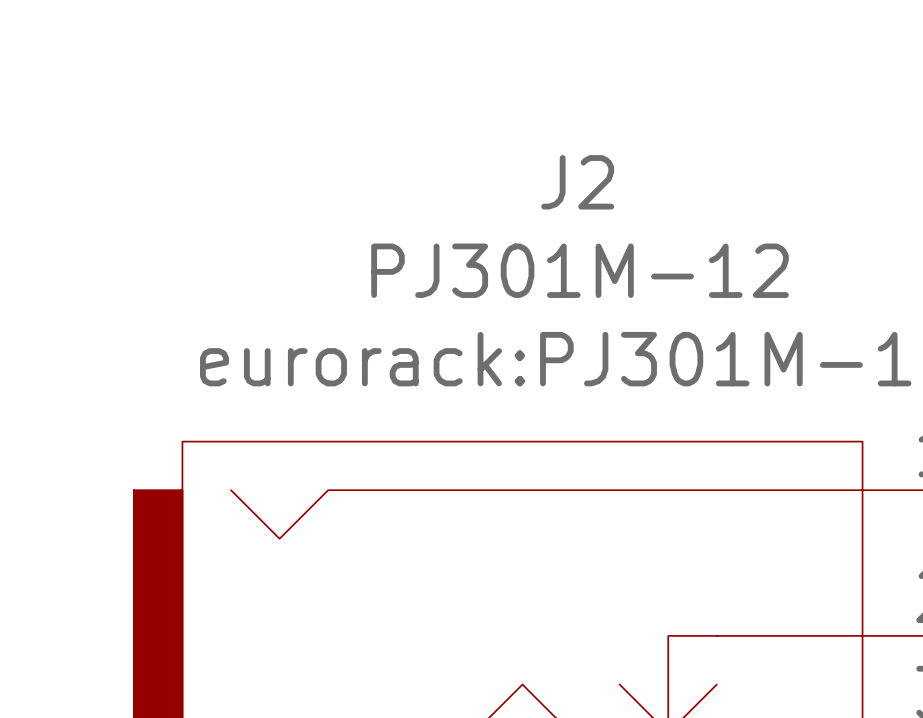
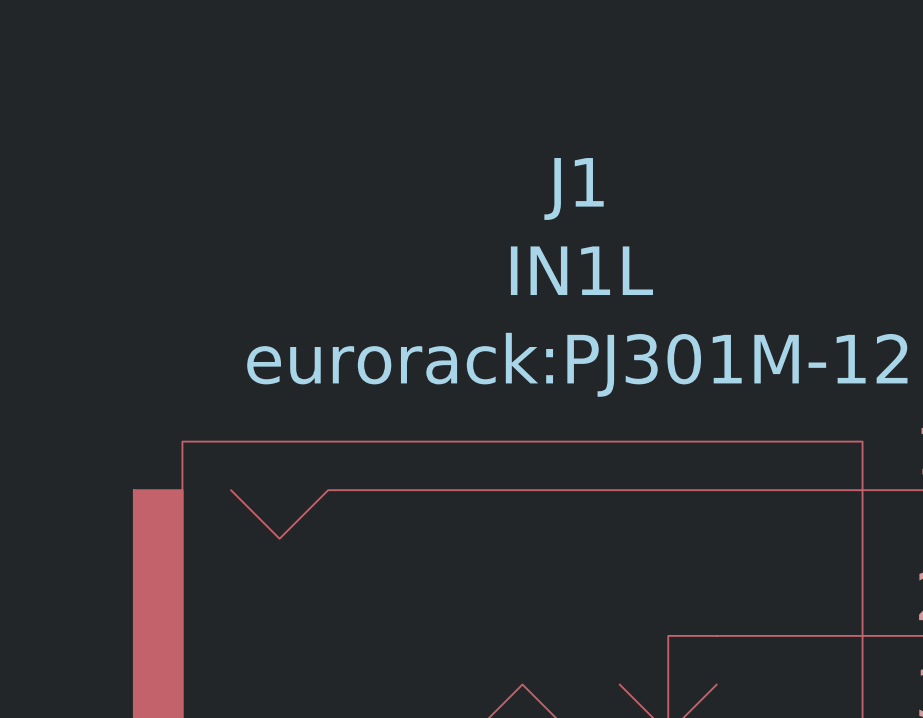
J2 name: J2 (577, 182) -> J1 (574, 188)
J2 value: PJ301M-12 (580, 270) -> IN1L (581, 270)

